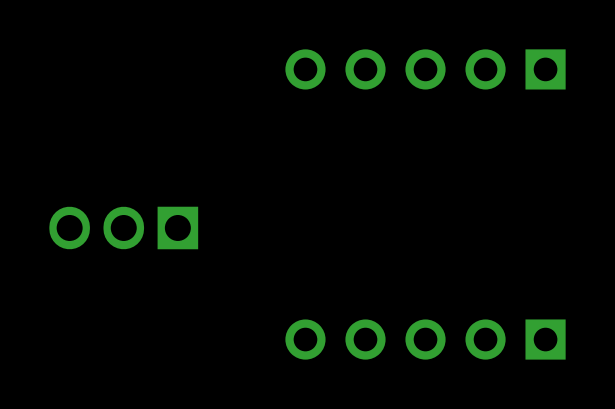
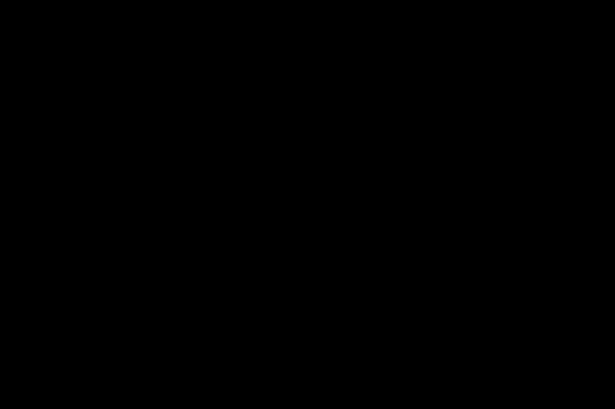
part: (425, 69) -> none
part: (123, 227) -> none
part: (425, 339) -> none

